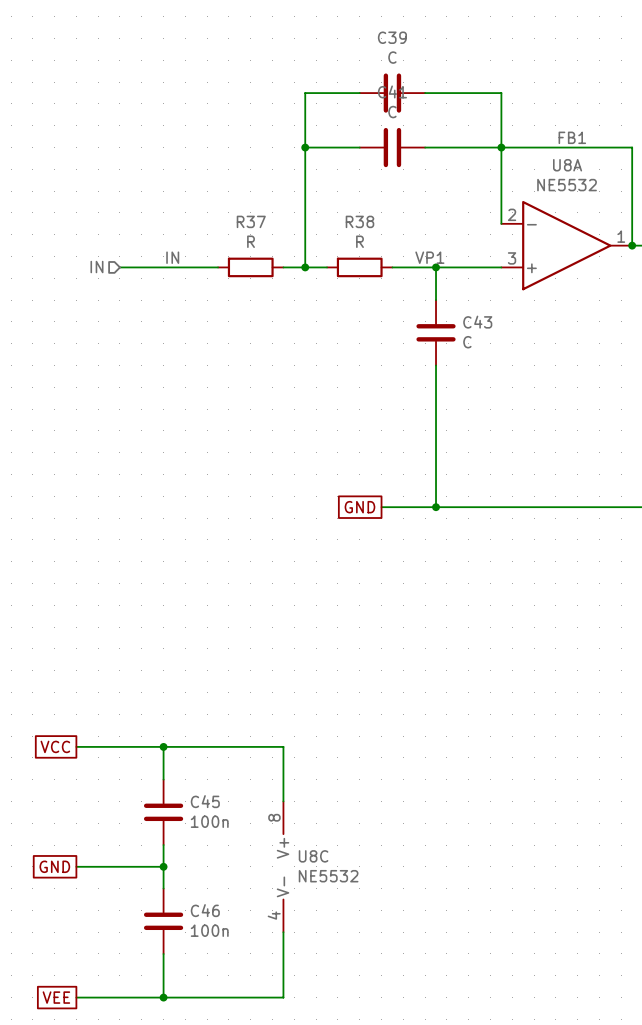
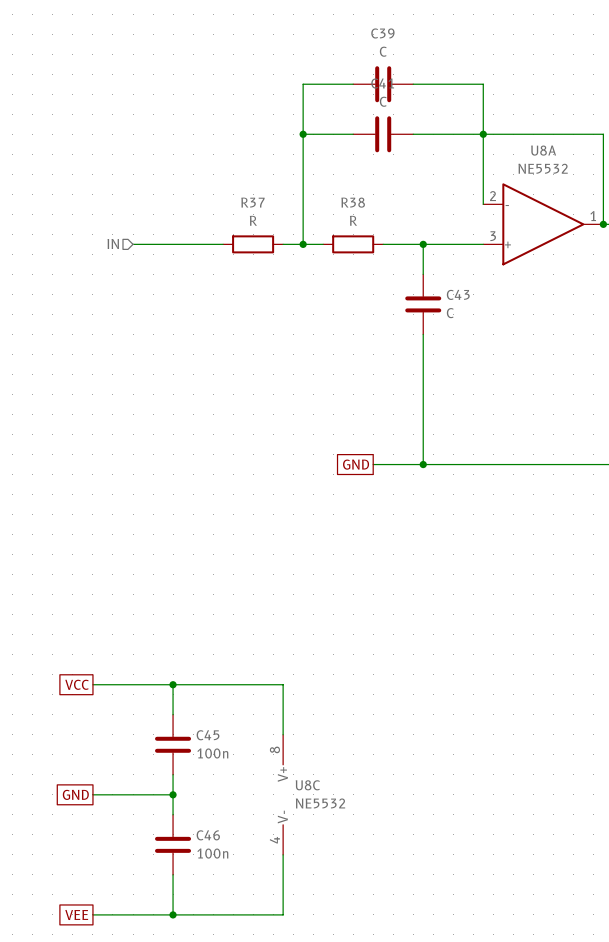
label: FB1 (572, 137) -> none
label: IN (172, 257) -> none
label: VP1 (429, 257) -> none

